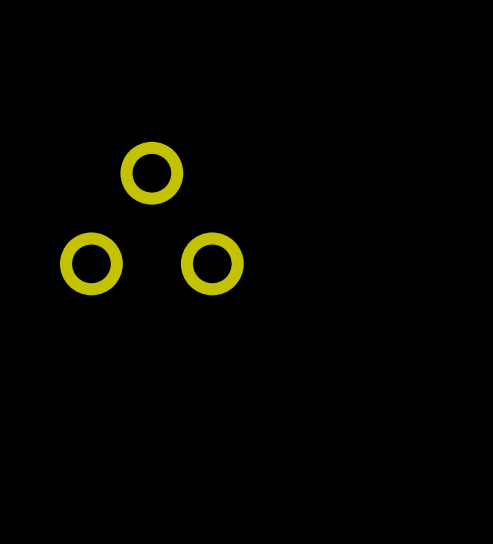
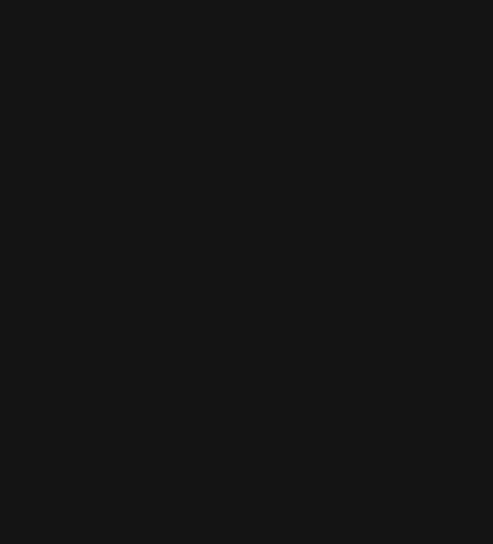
part: (151, 218) -> none

